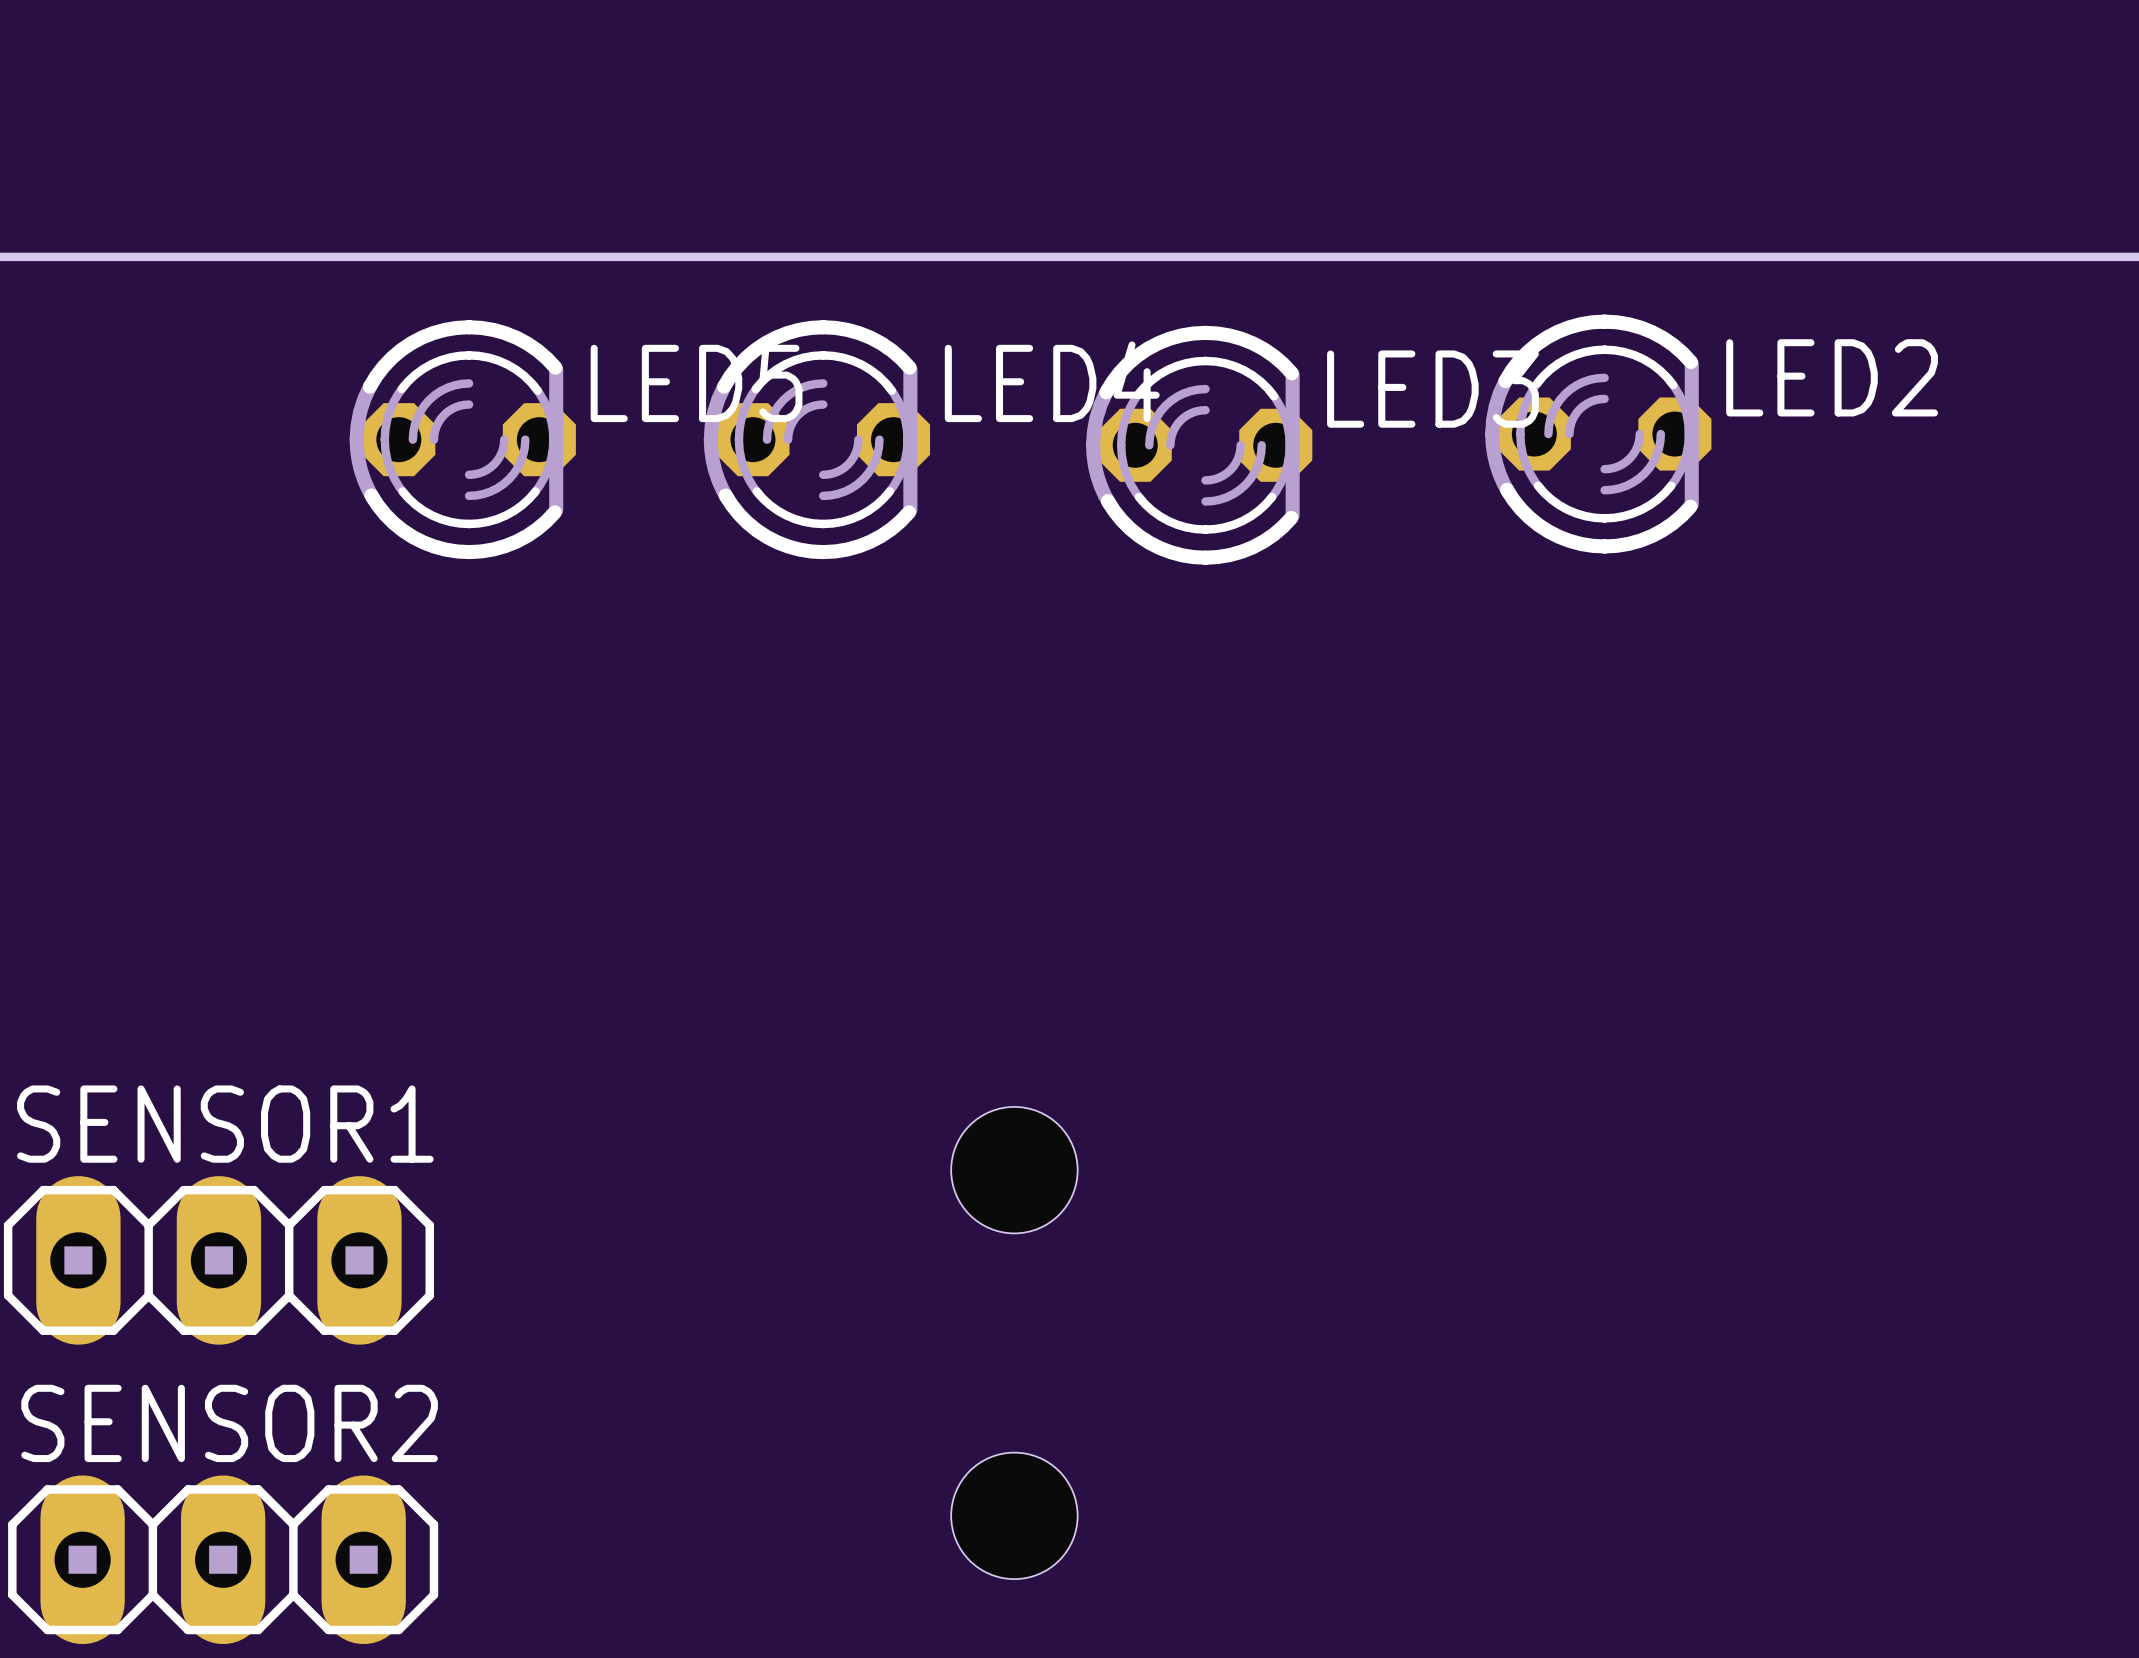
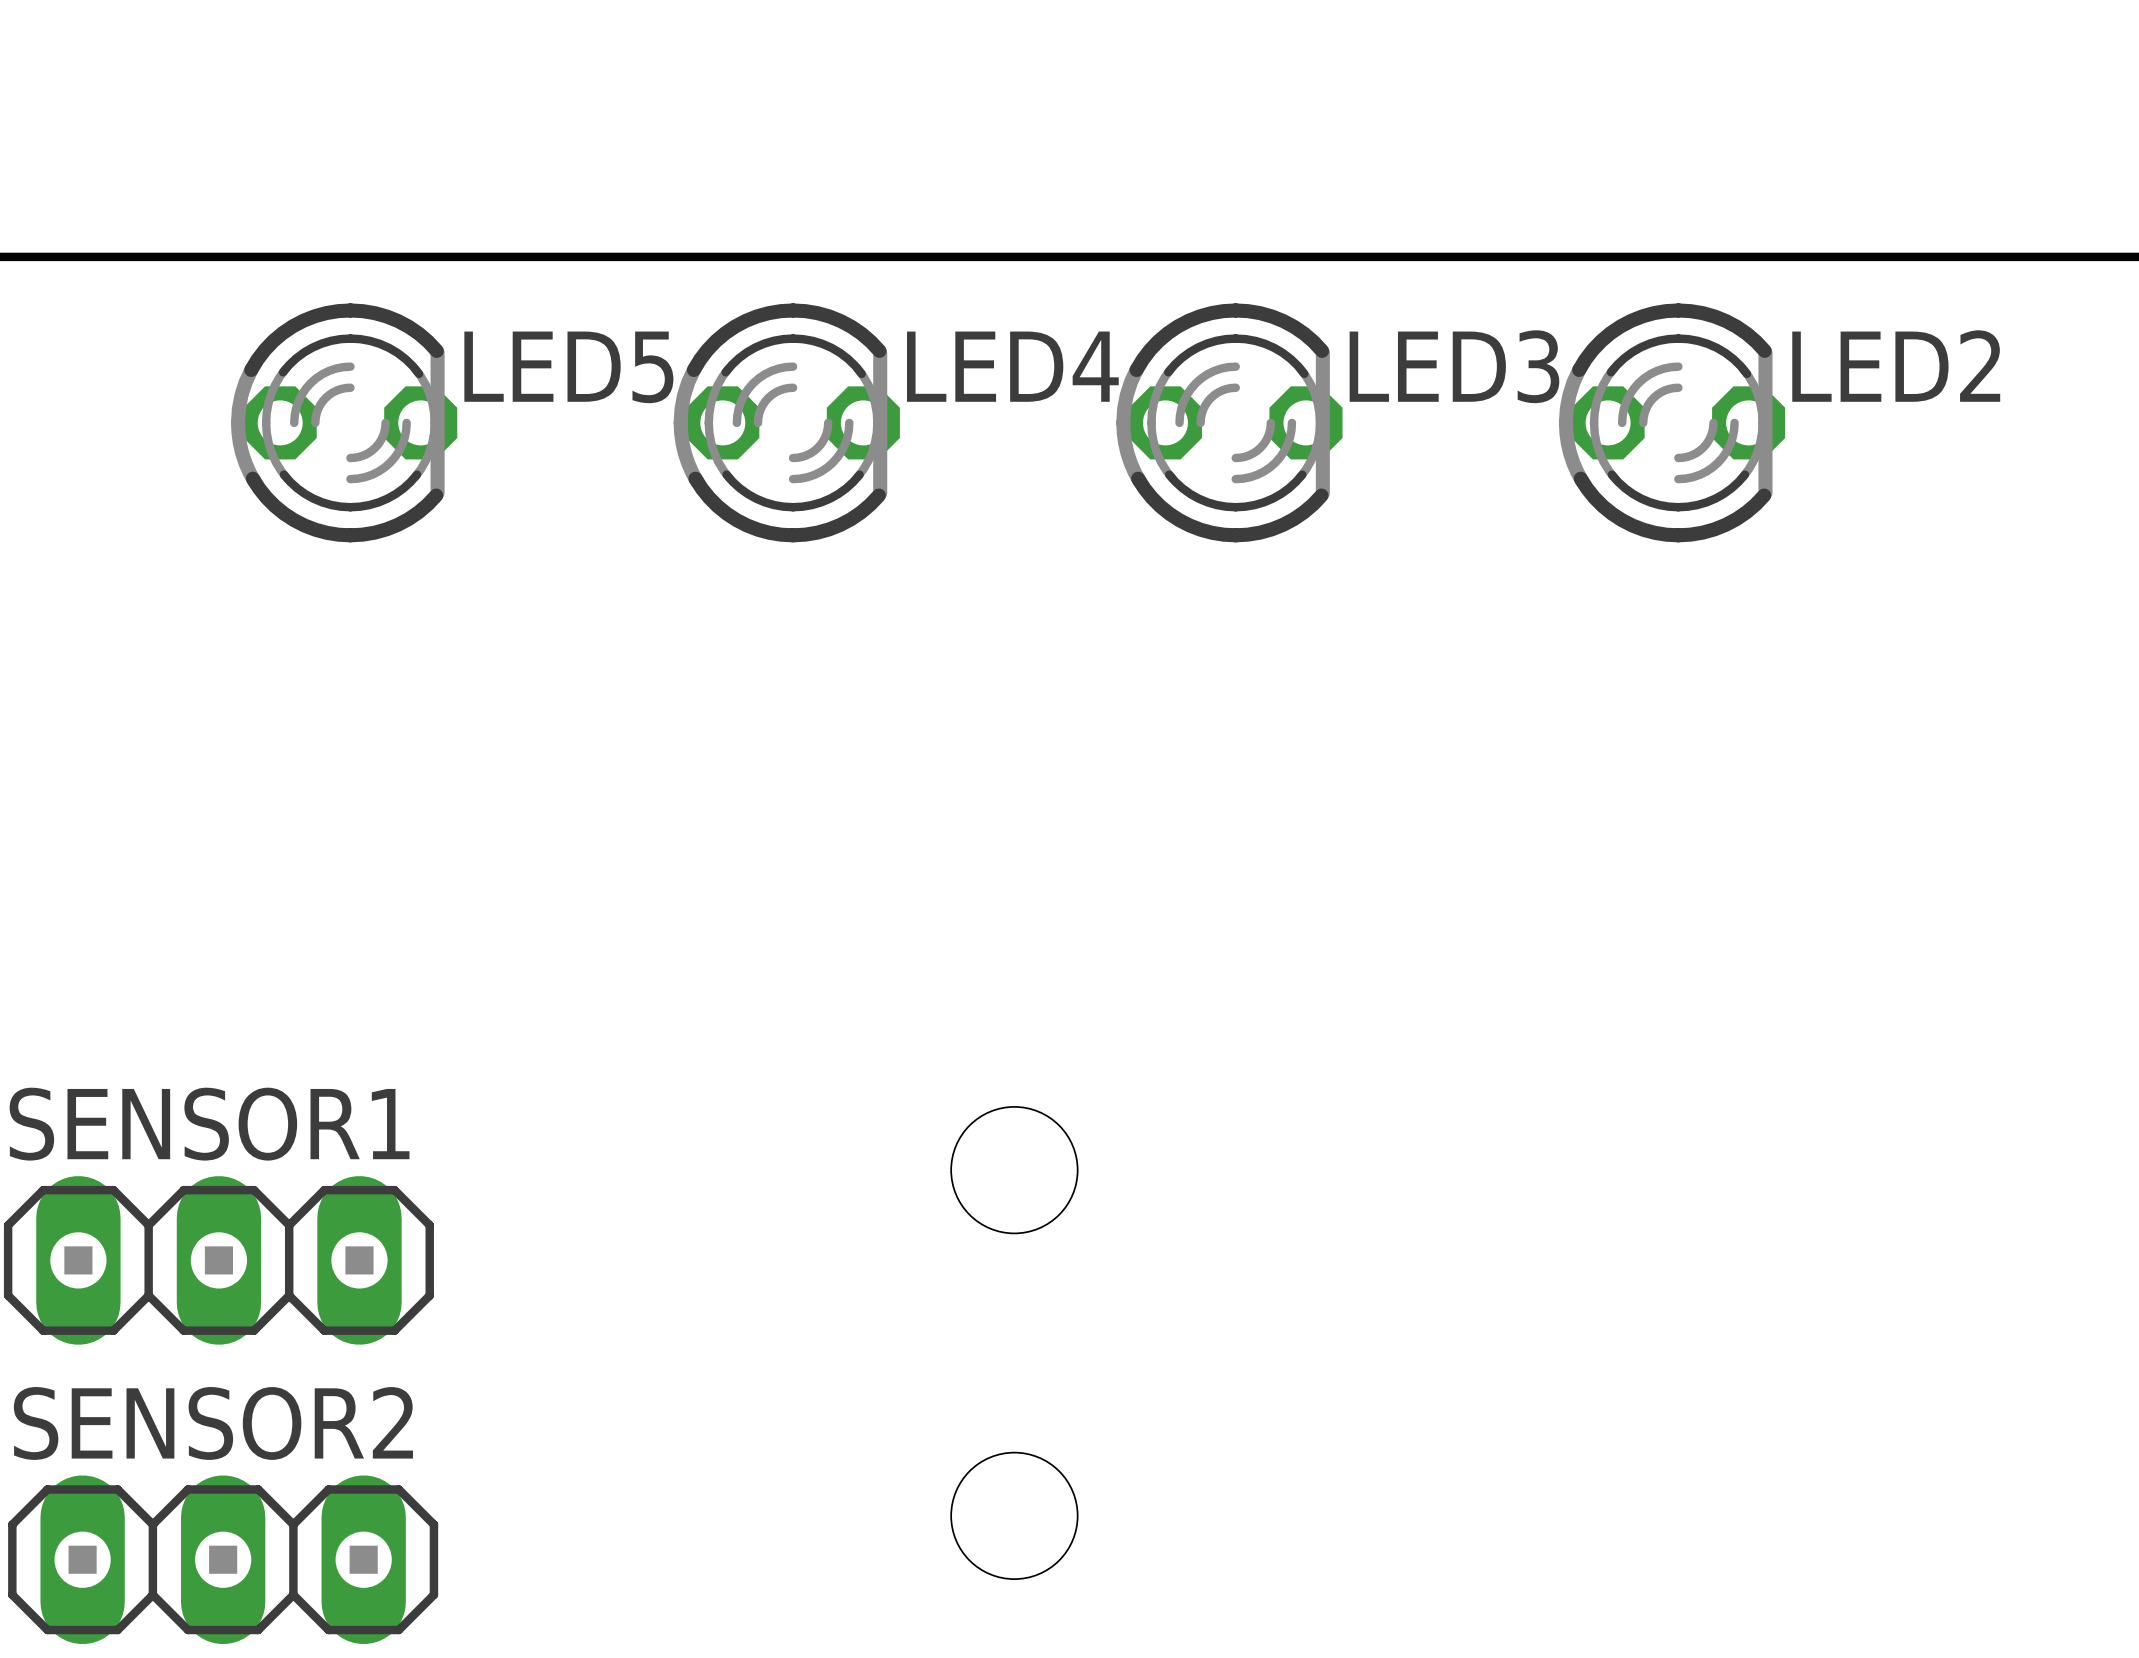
LED2 position: (1598, 434) -> (1672, 422)
LED5 position: (462, 439) -> (344, 422)
LED4 position: (816, 439) -> (786, 422)
LED3 position: (1199, 445) -> (1229, 422)

